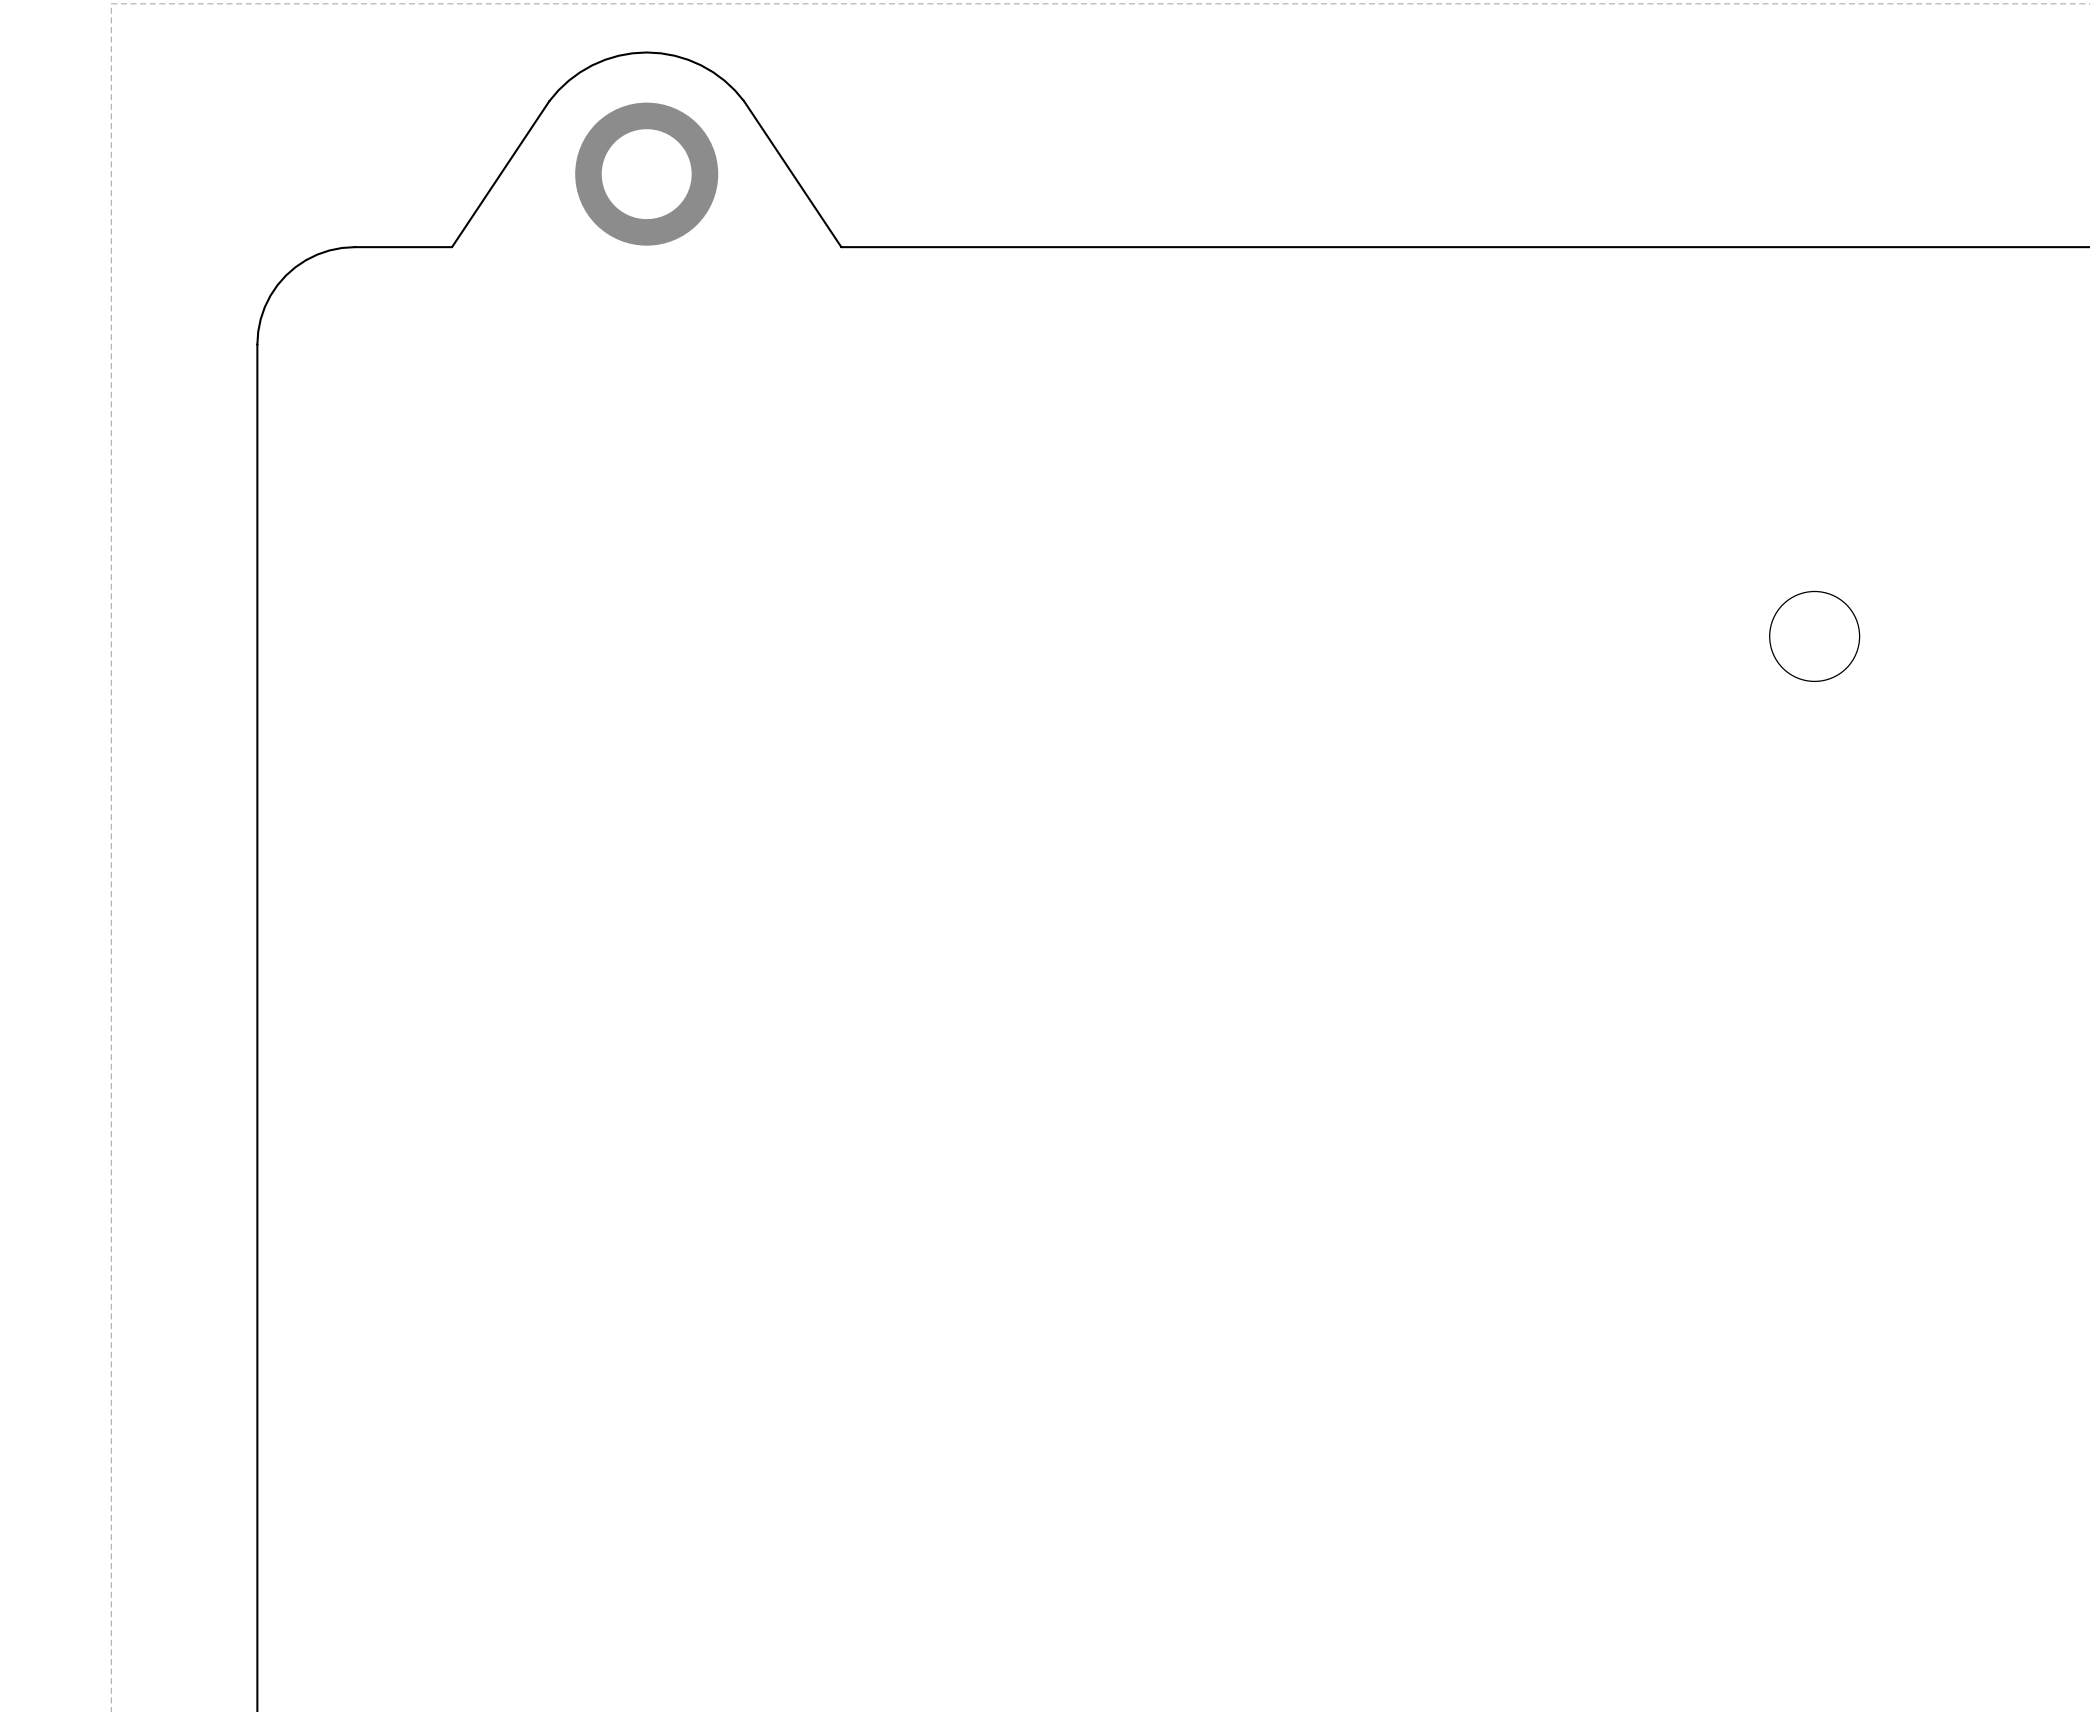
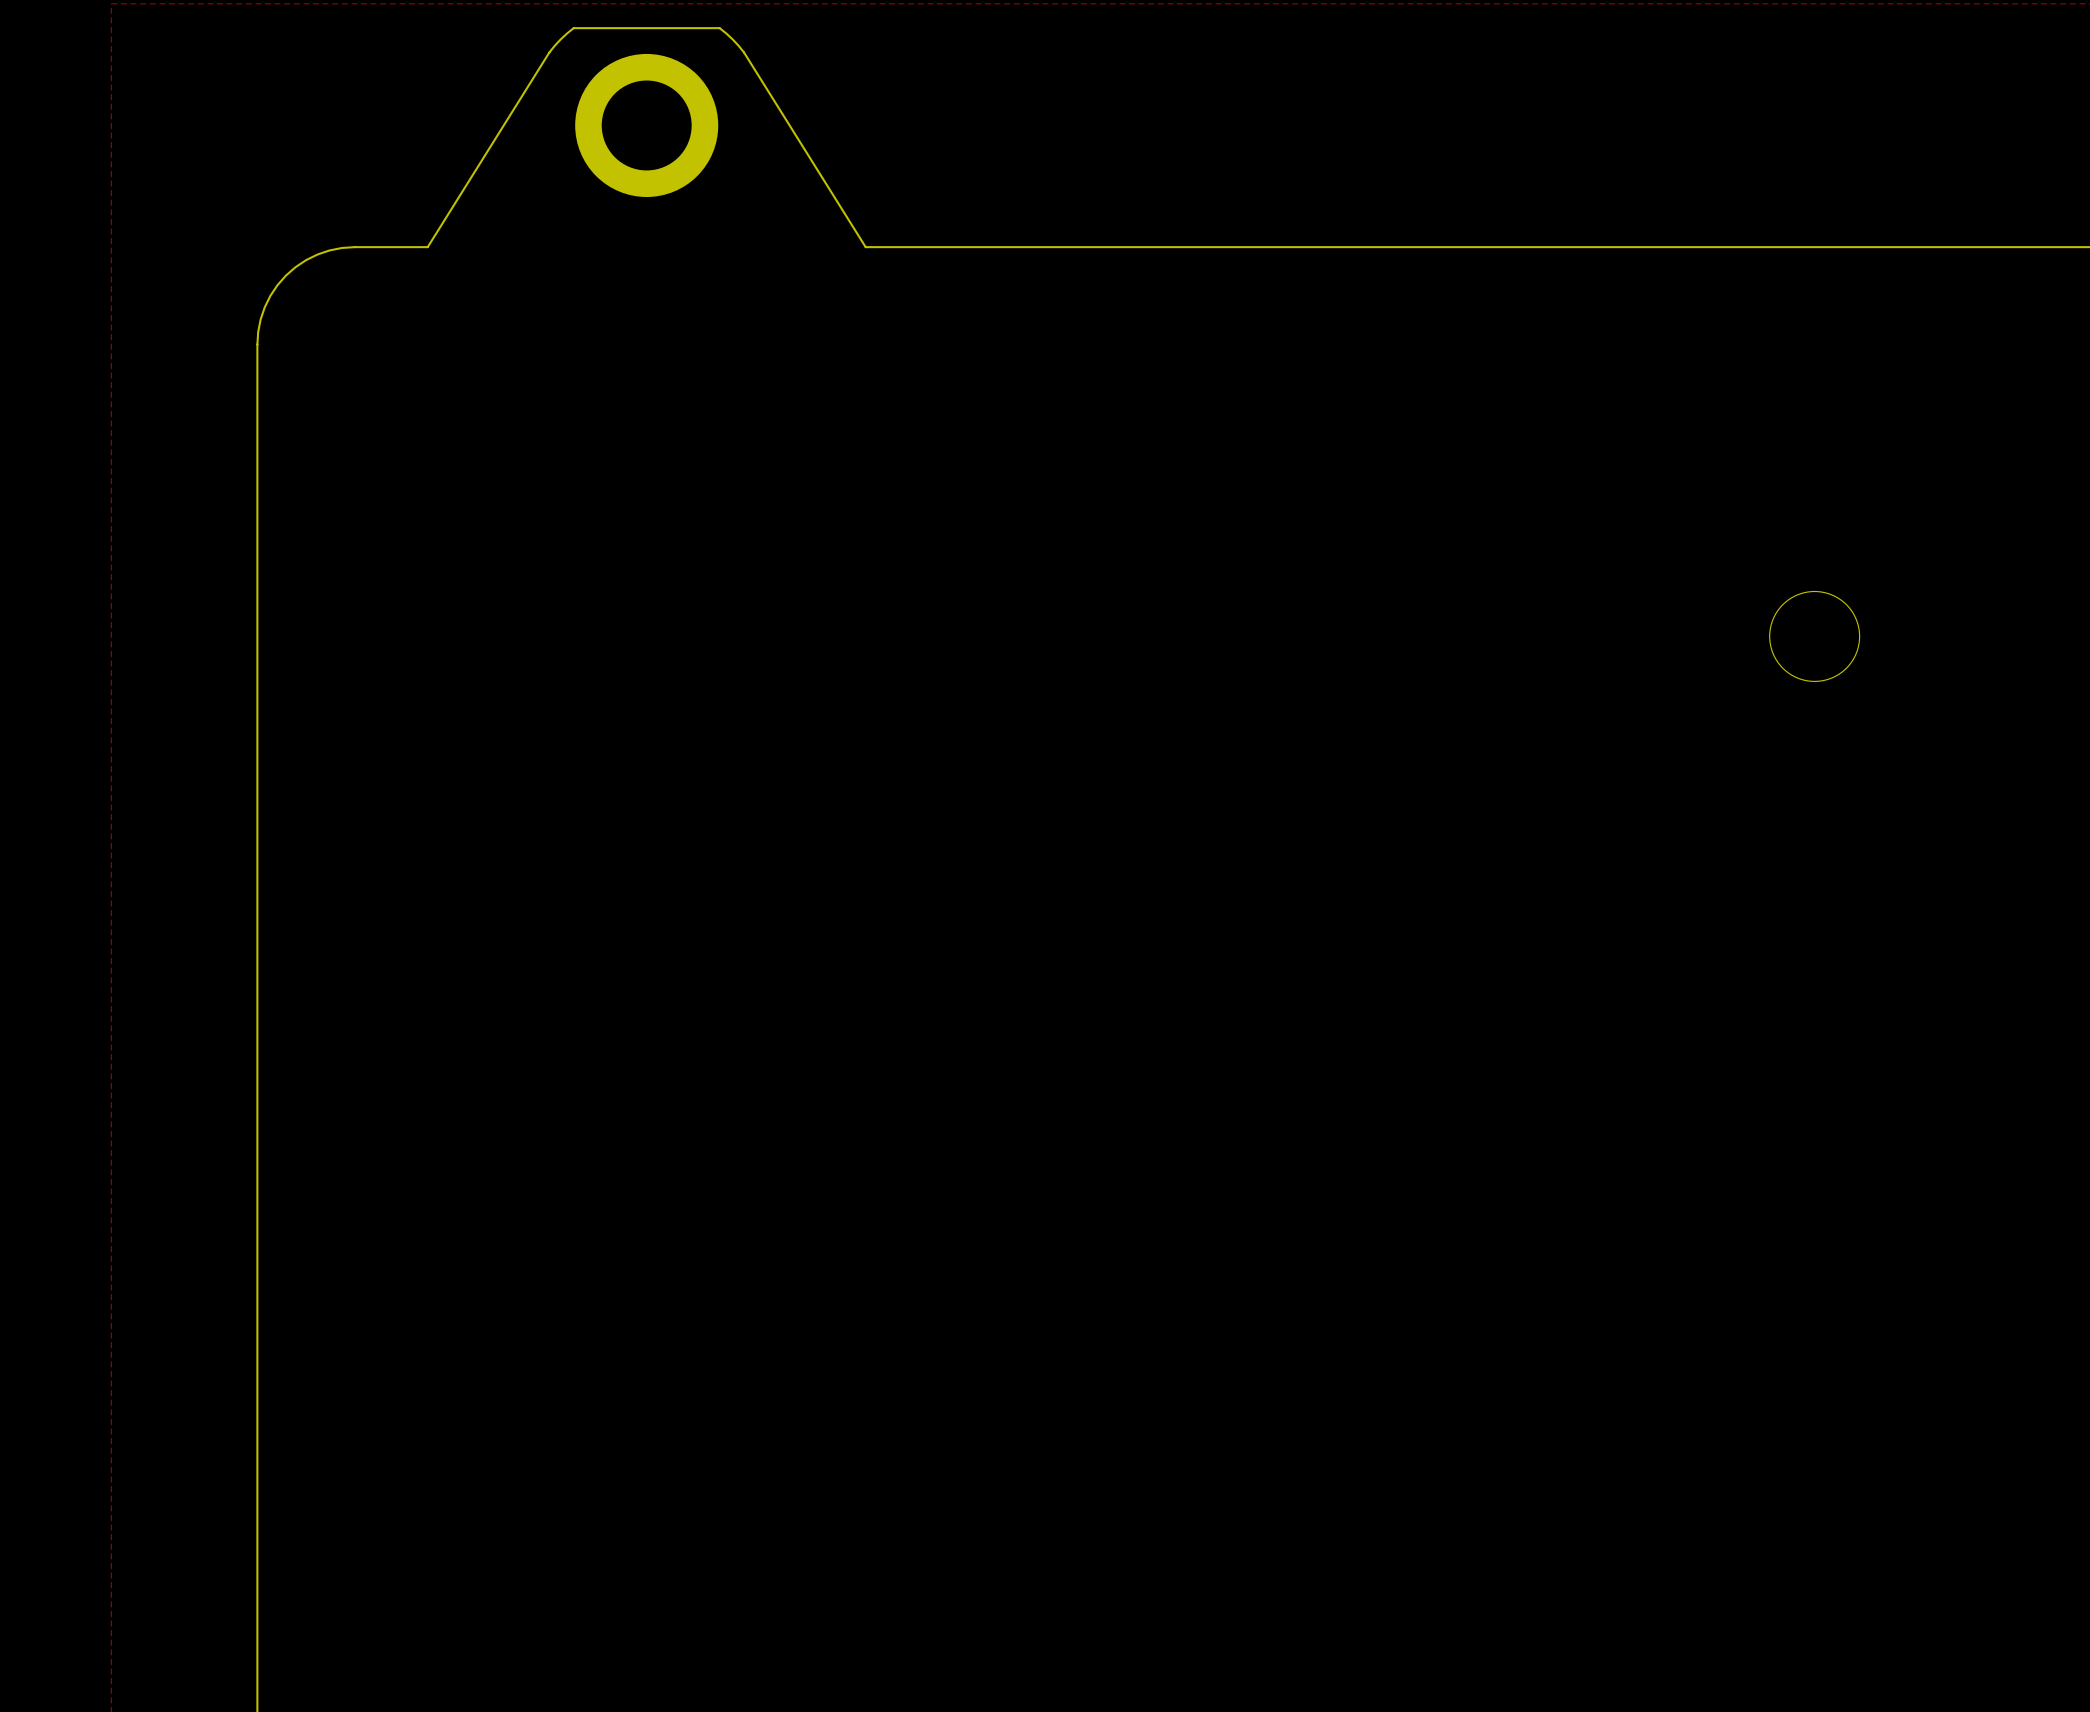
part position: (646, 174) -> (646, 125)
board edge: (427, 247) (452, 247) (549, 101) (568, 80) (580, 72) (605, 59) (632, 53) (646, 52) (660, 53) (688, 59) (713, 72) (724, 80) (744, 101) (841, 247) (865, 247) -> (427, 247) (549, 52) (573, 28) (719, 28) (744, 52) (865, 247)

